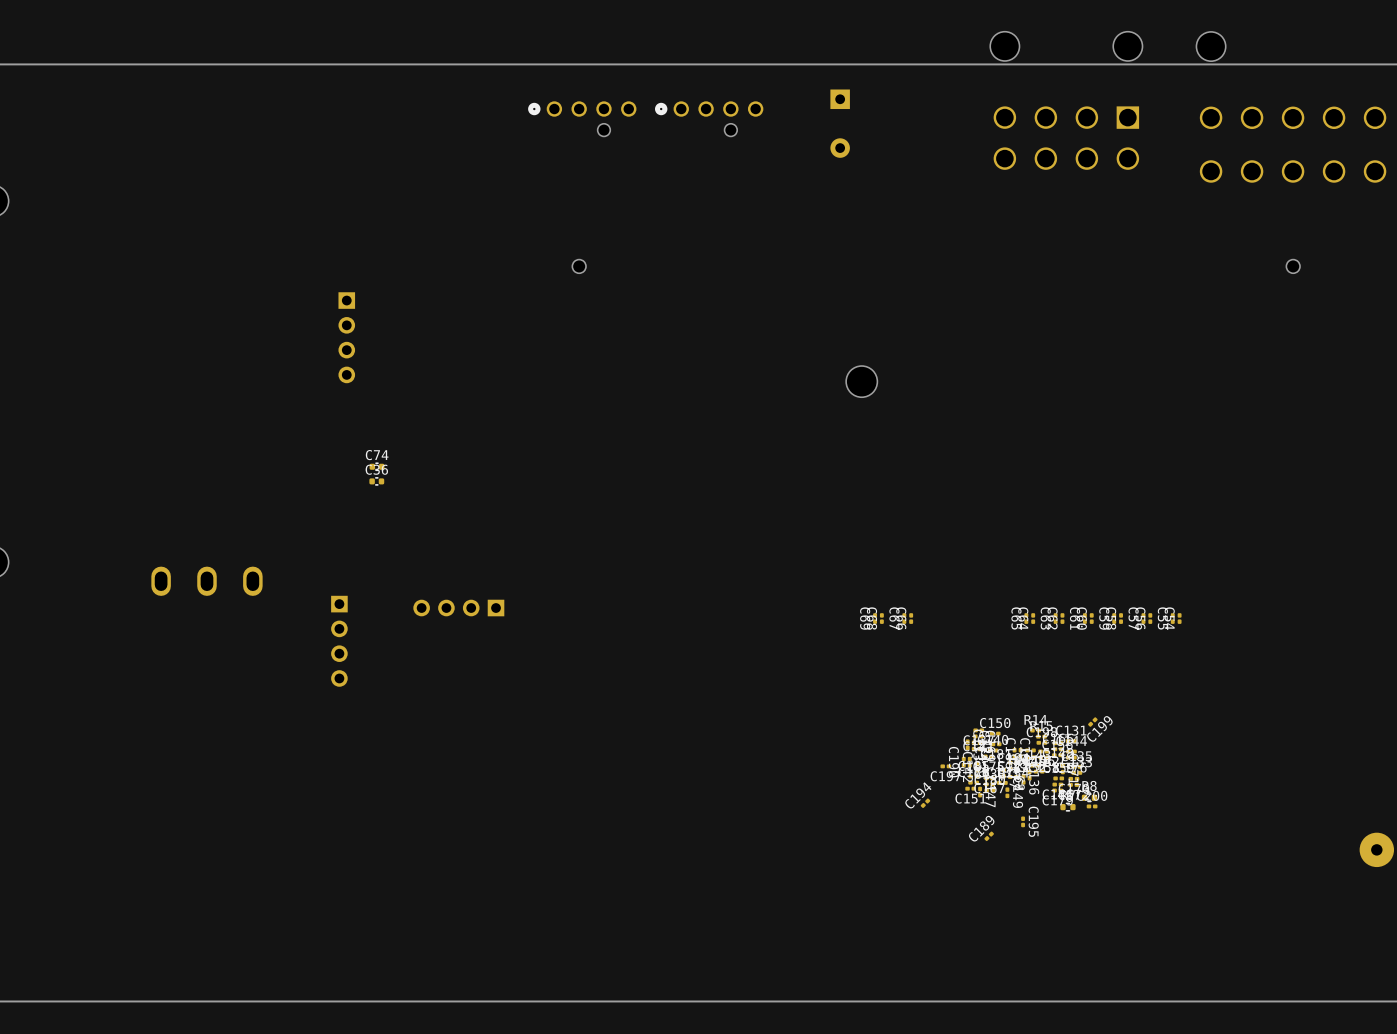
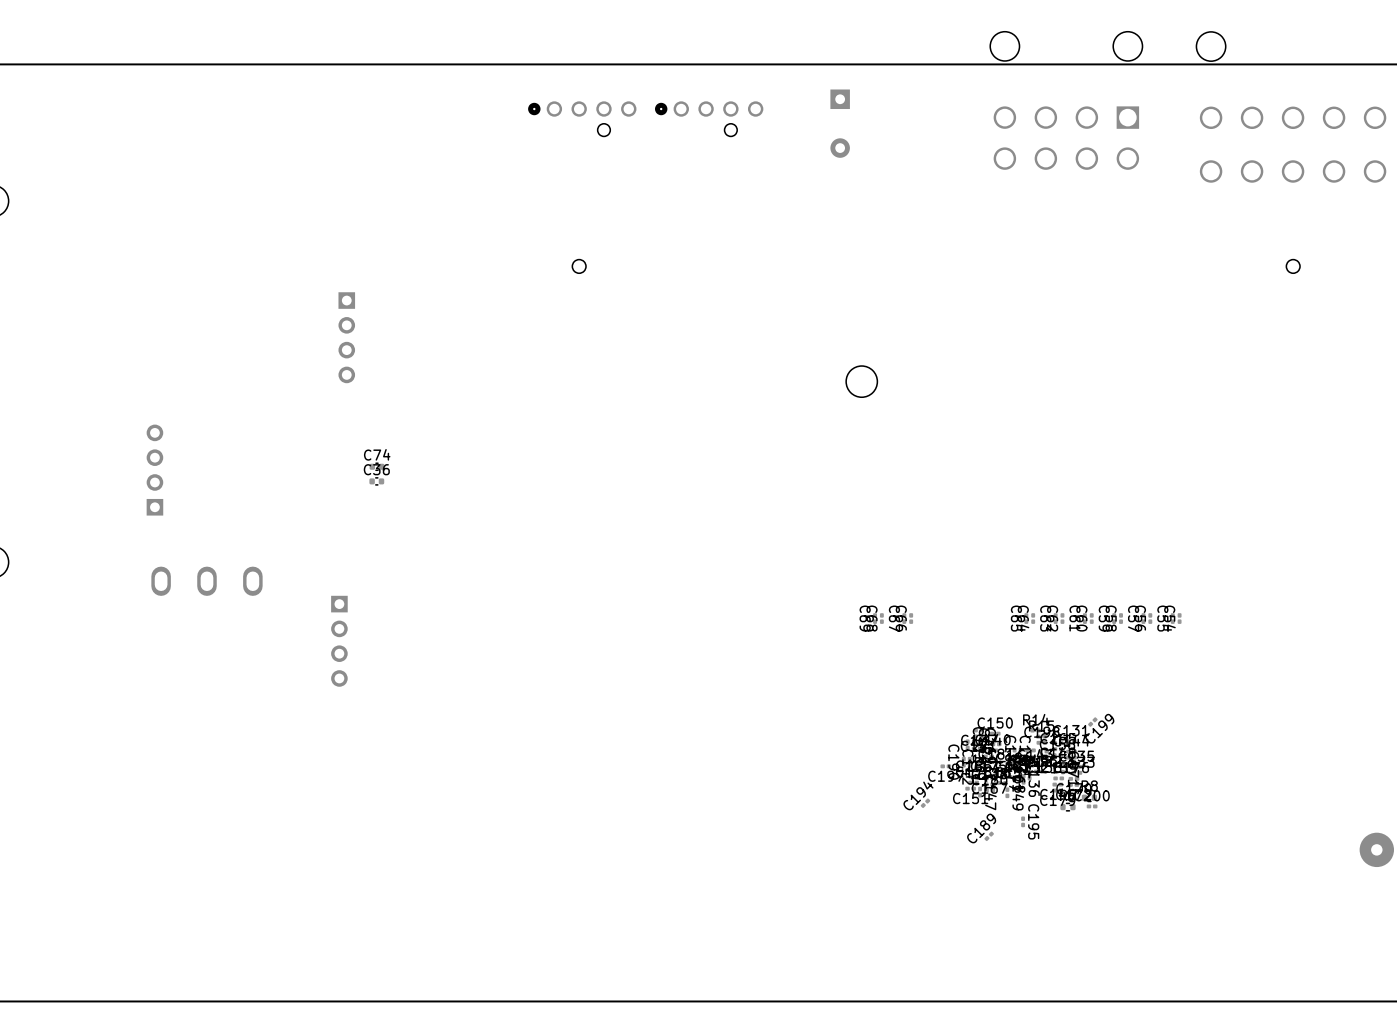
part: none -> (154, 470)
part: (458, 608) -> none

